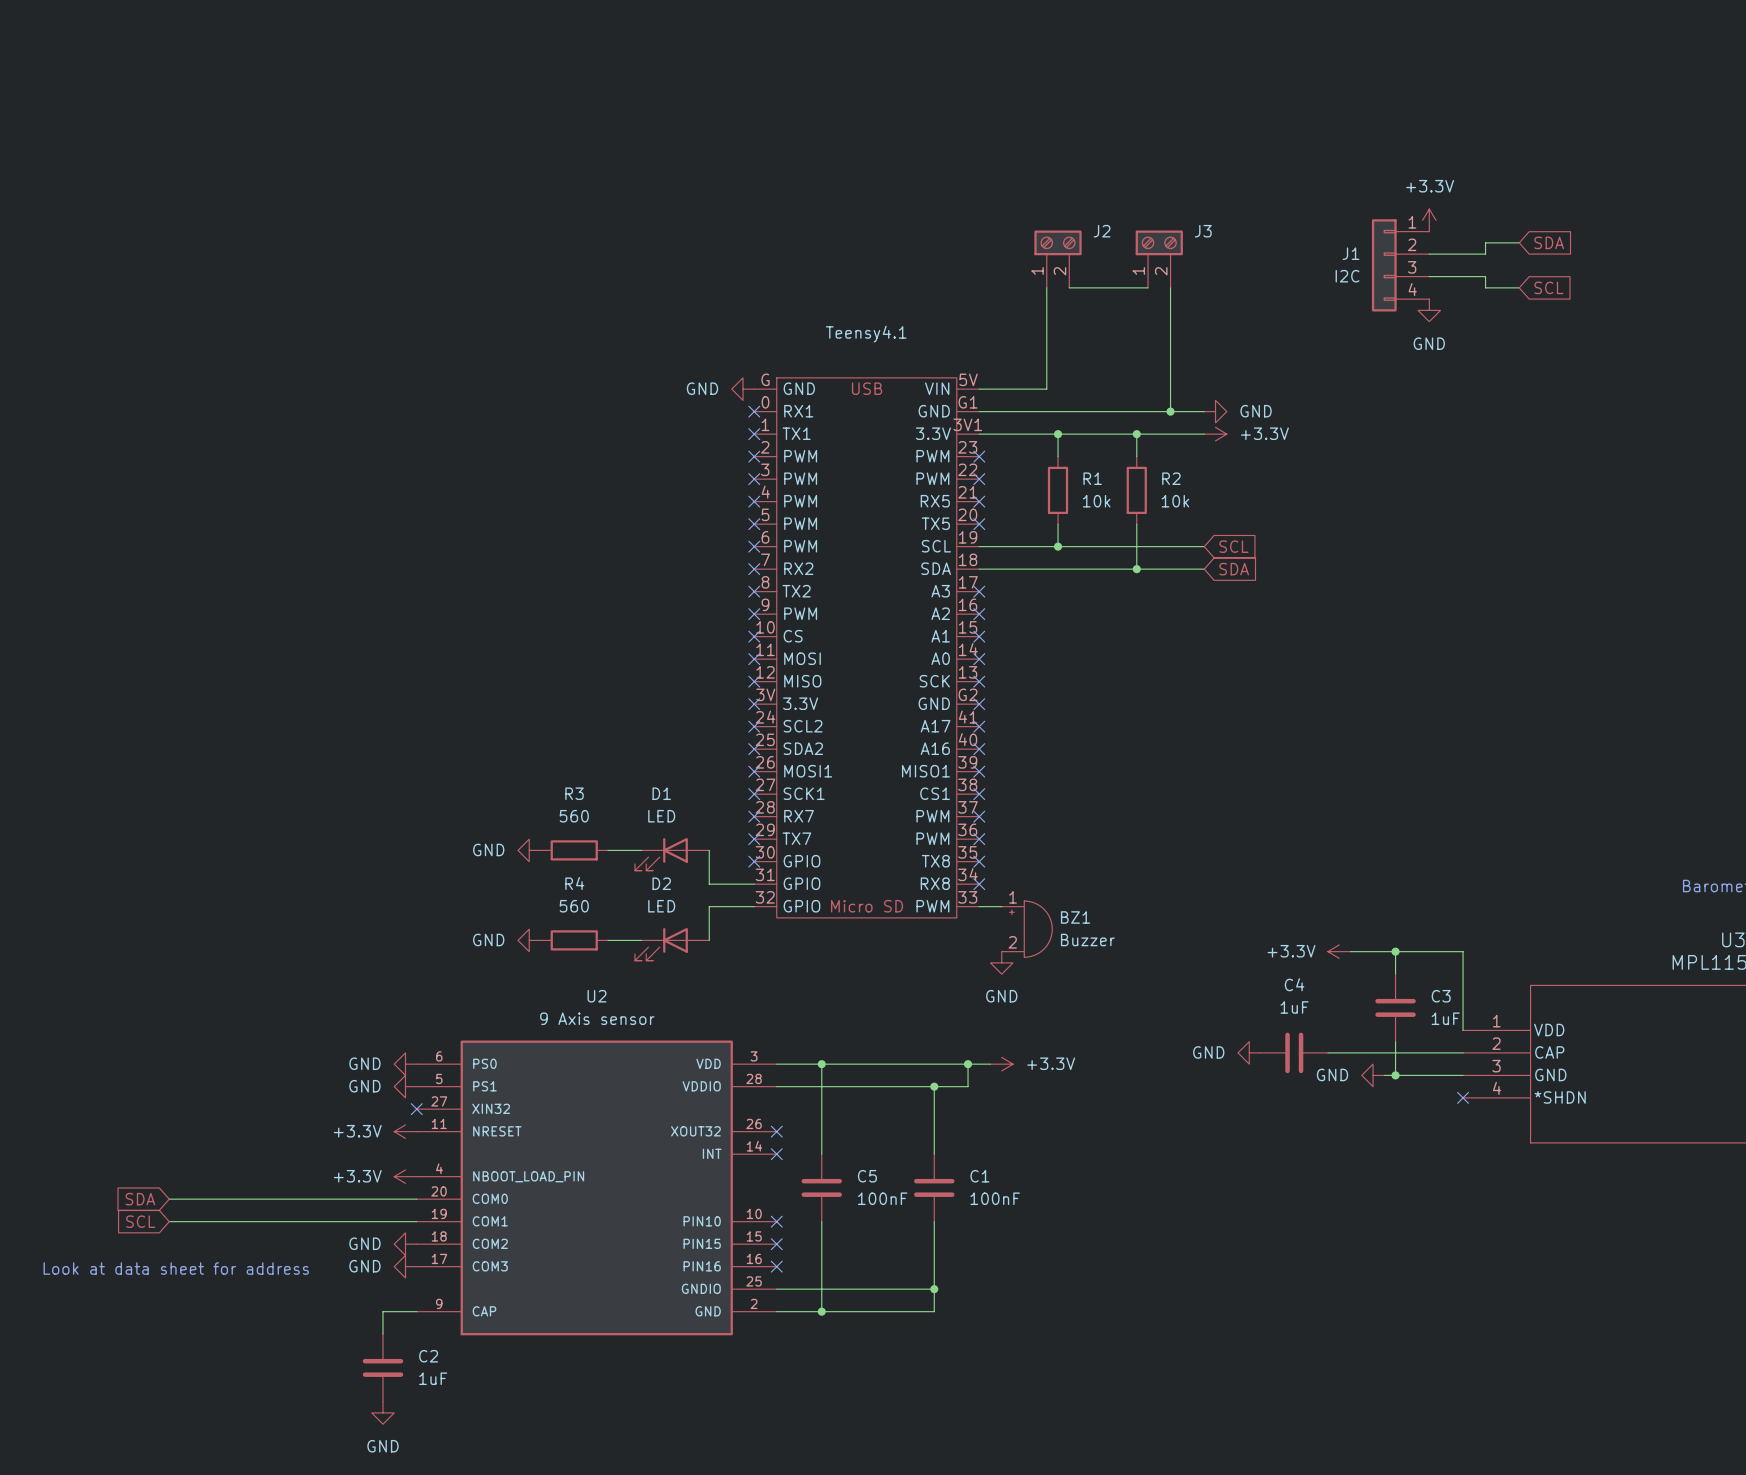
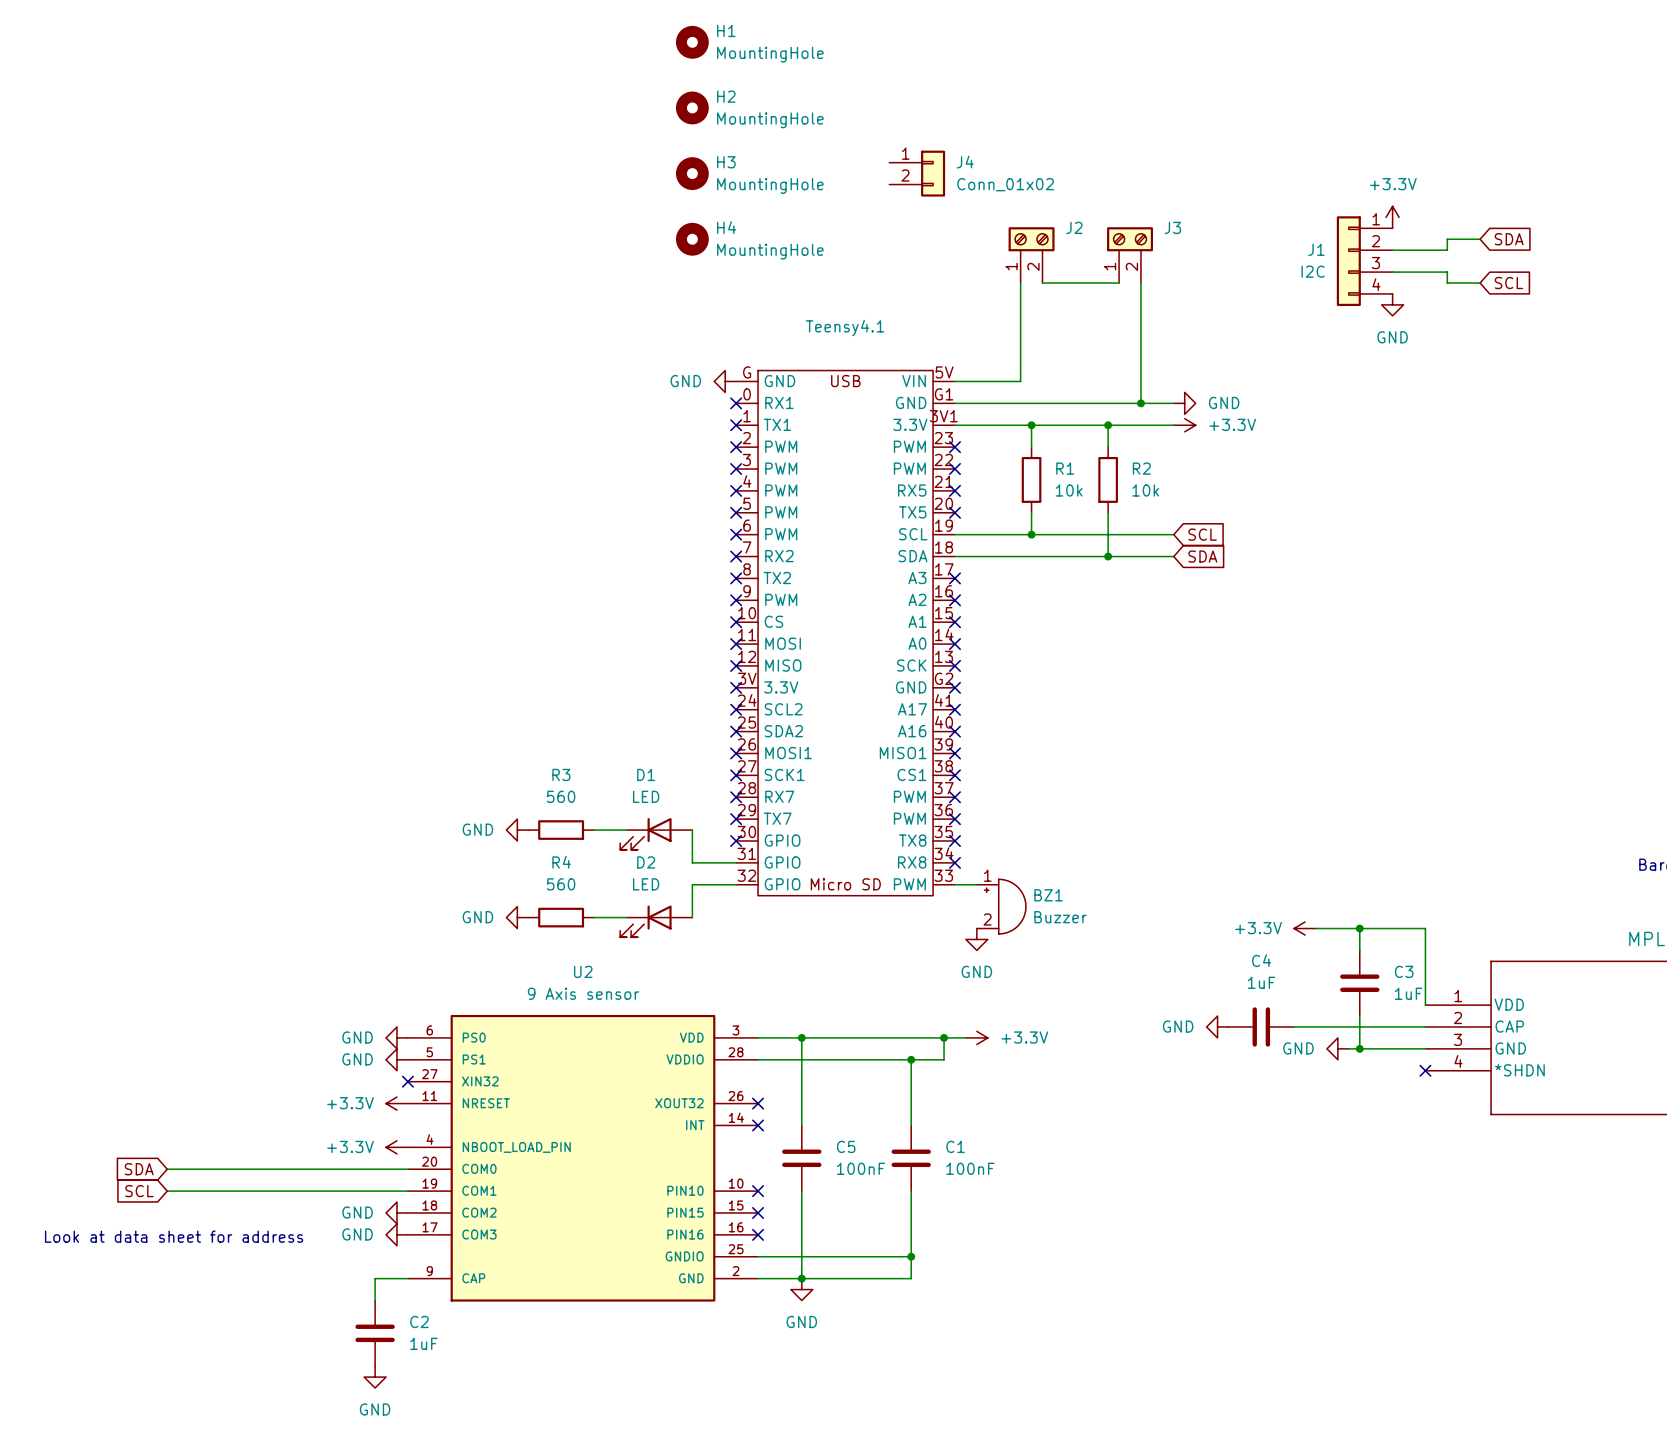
H1: none -> MountingHole (692, 42)
H2: none -> MountingHole (692, 107)
H3: none -> MountingHole (692, 173)
J4: none -> Conn_01x02 (917, 173)
H4: none -> MountingHole (692, 239)
power symbol: none -> GND (801, 1289)

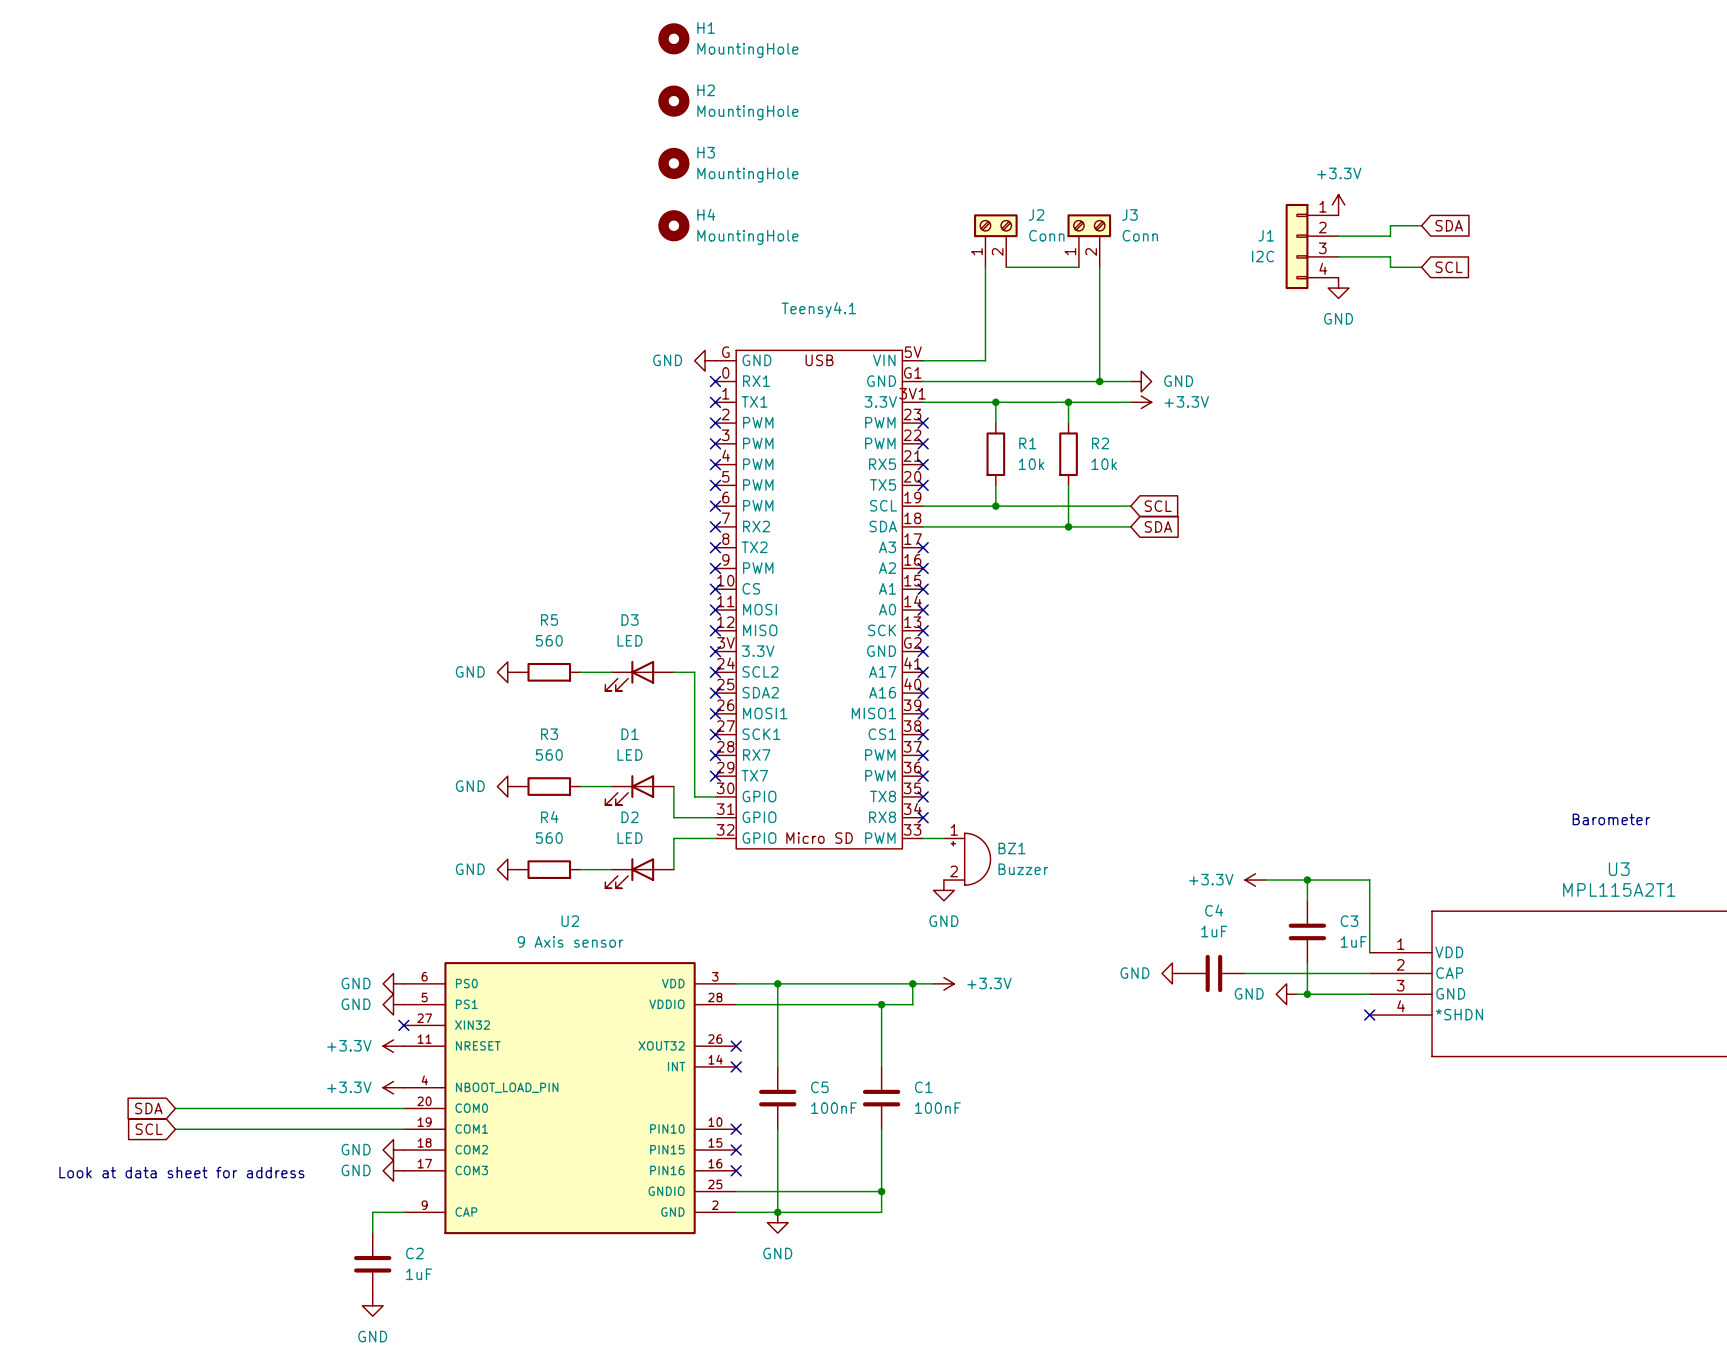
J4: Conn_01x02 (917, 173) -> none
J2 value: none -> Conn (1046, 235)
J3 value: none -> Conn (1140, 235)
power symbol: none -> GND (507, 672)
R5: none -> 560 (549, 672)
wire: none -> (580, 672) (611, 672)
wire: none -> (673, 672) (694, 672) (694, 796) (715, 796)
D3: none -> LED (639, 675)
no-connect mark: (736, 841) -> none

